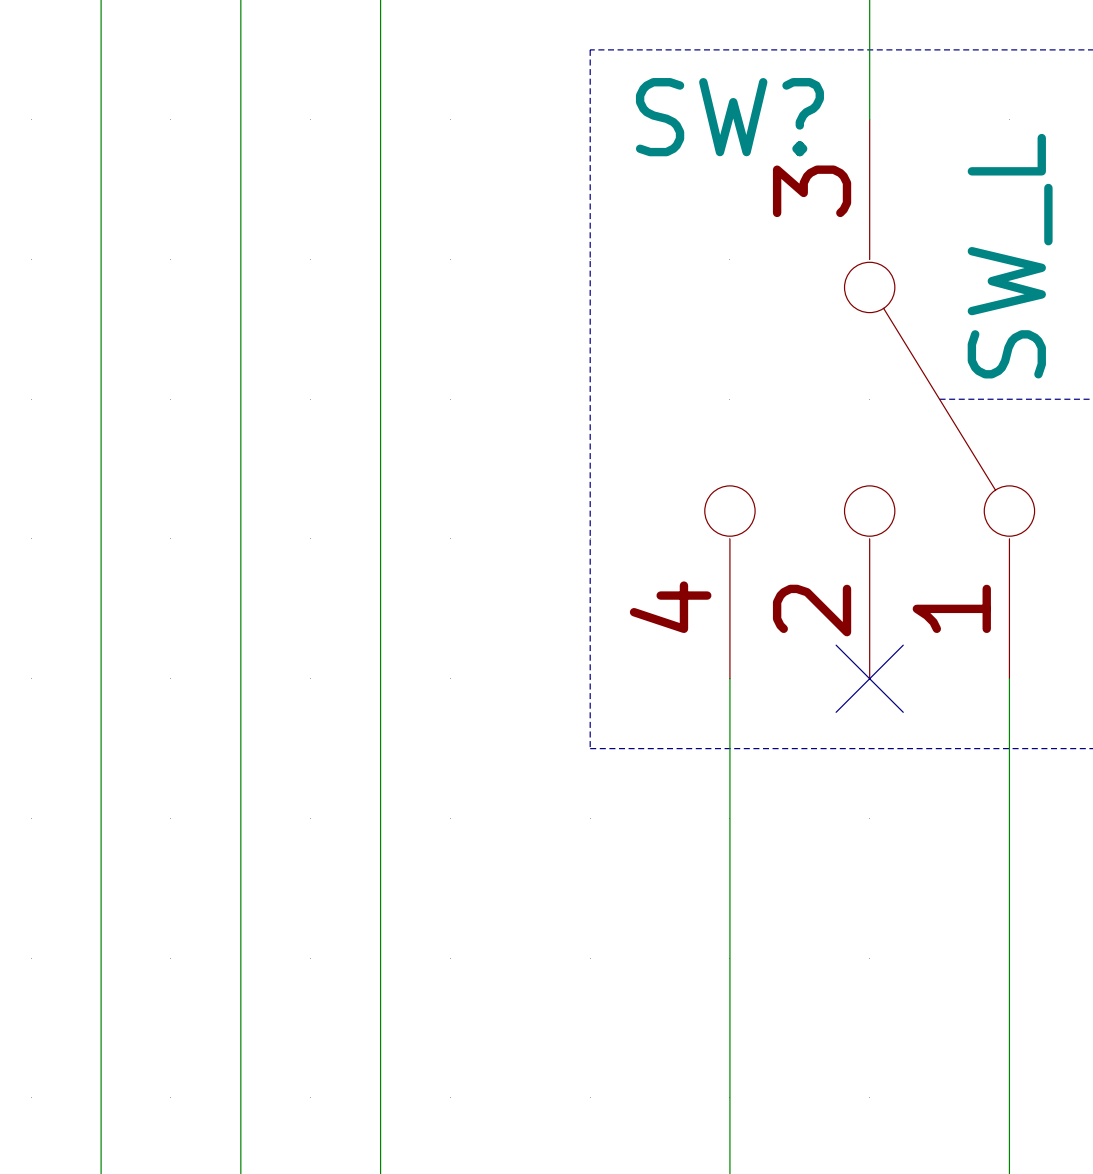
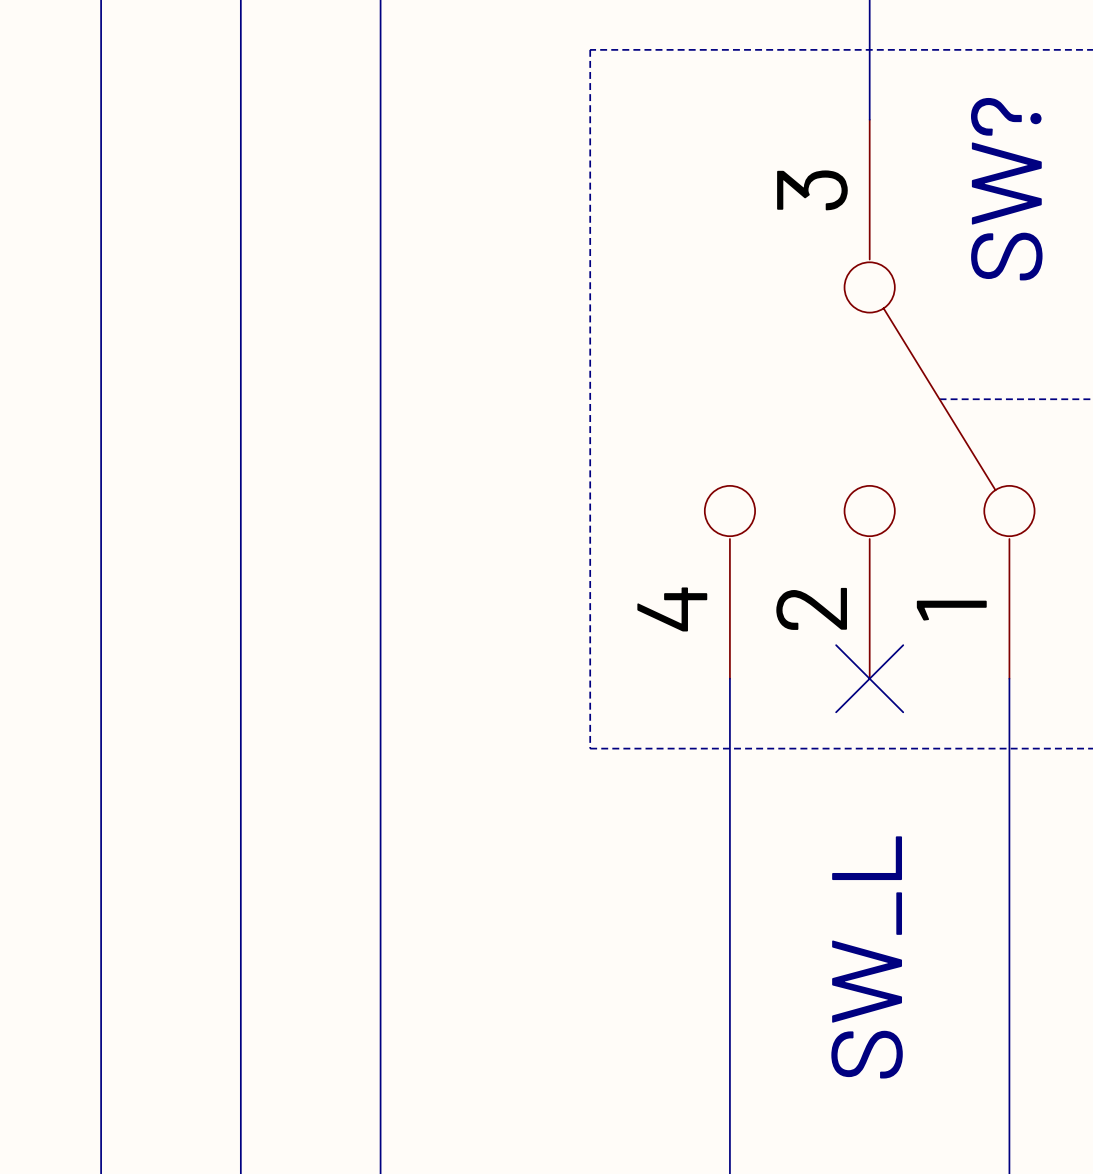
SW? name rotation: 0° (729, 117) -> 90° counterclockwise (1006, 189)
SW? name position: SW? (729, 117) -> SW? (1006, 189)
SW? value position: SW_L (1010, 256) -> SW_L (867, 957)

